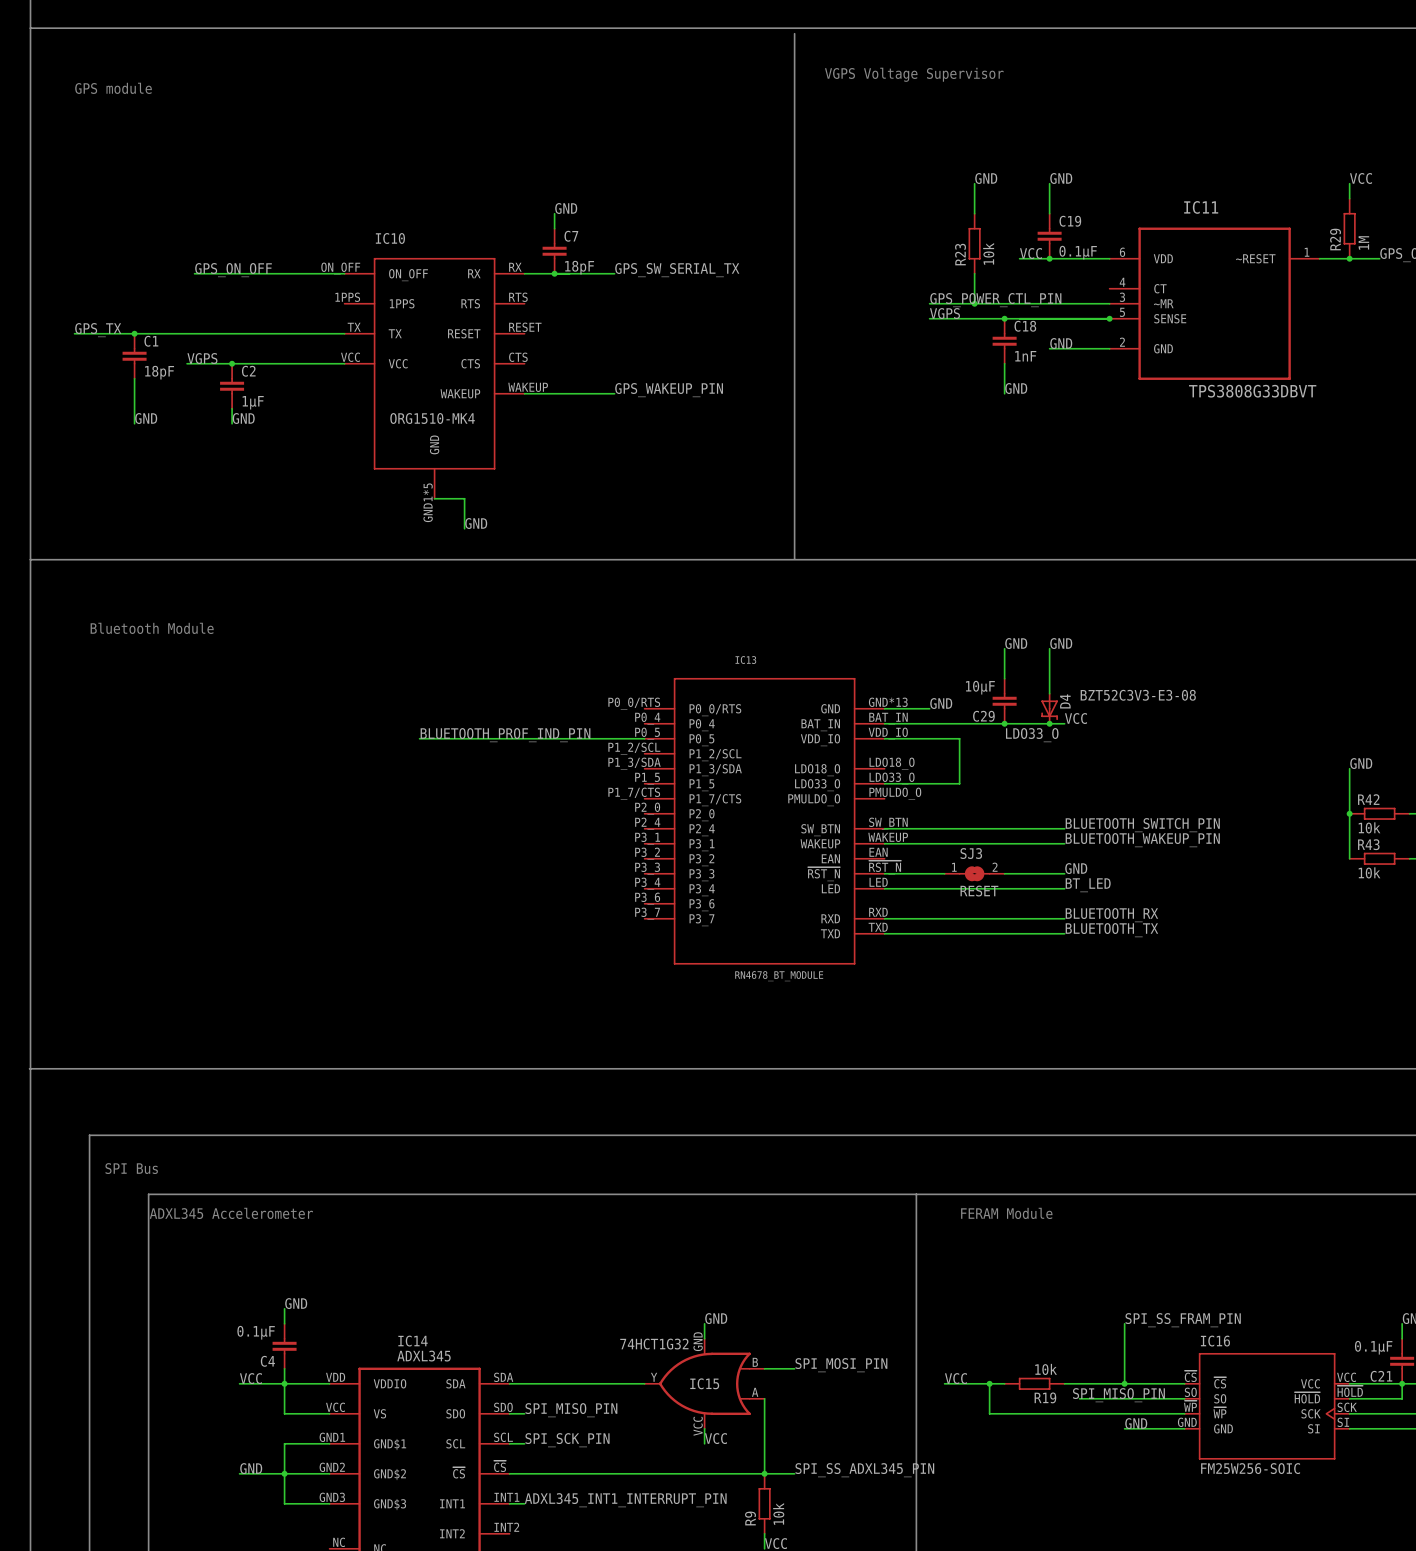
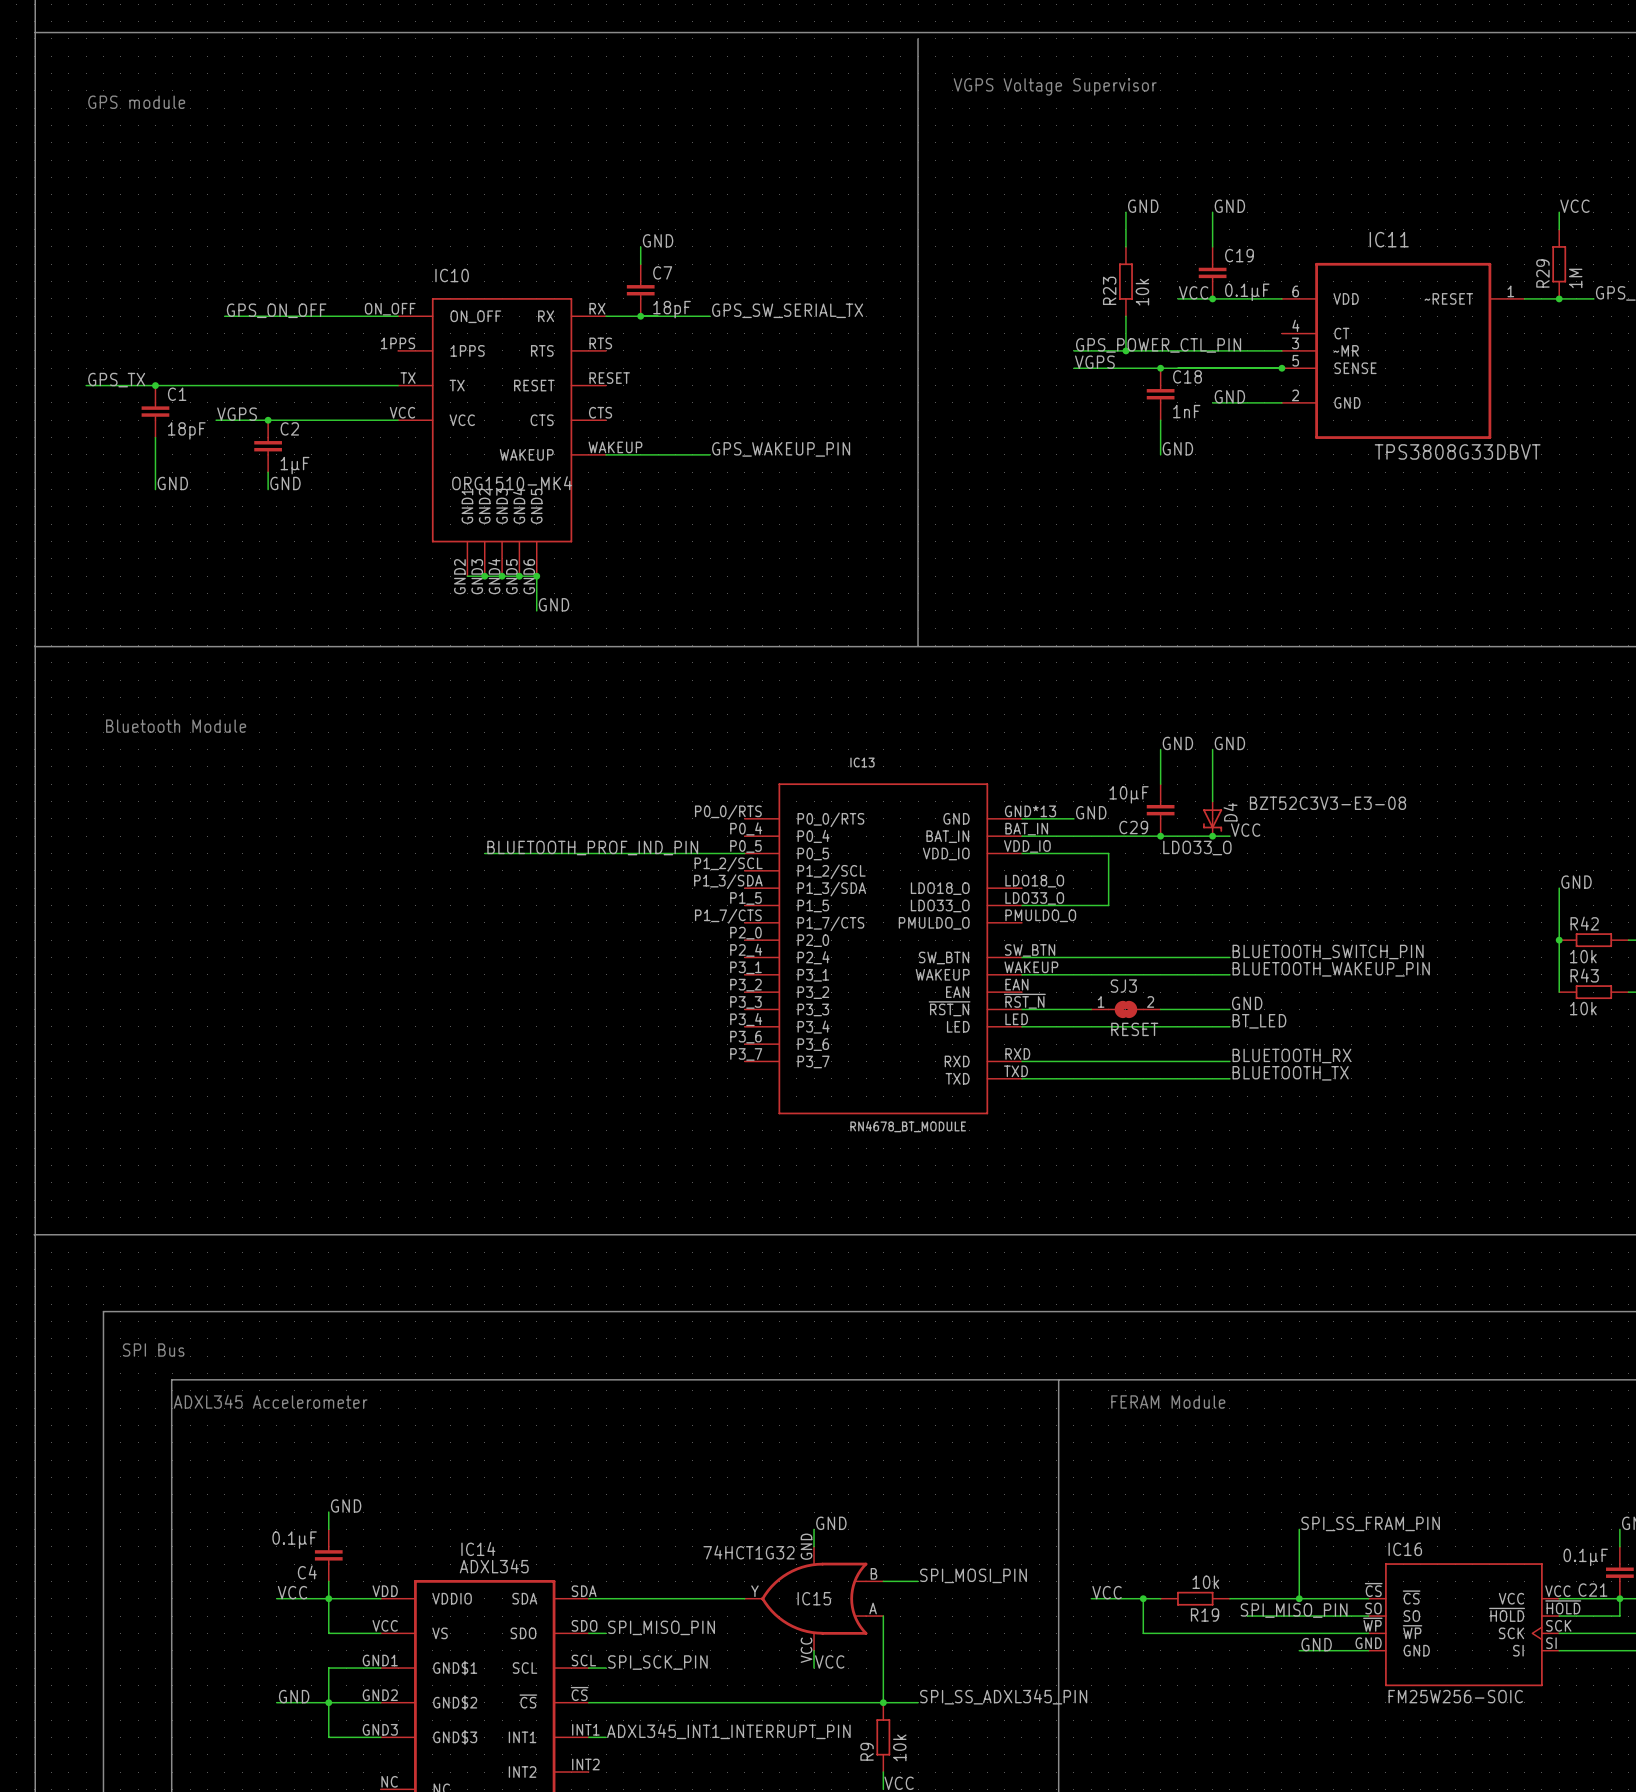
IC10 symbol: [344, 257, 525, 499] -> [398, 298, 607, 577]
wire: none -> (467, 576) (502, 576)
junction: none -> (484, 576)
junction: none -> (502, 576)
junction: none -> (519, 576)
junction: none -> (536, 576)

